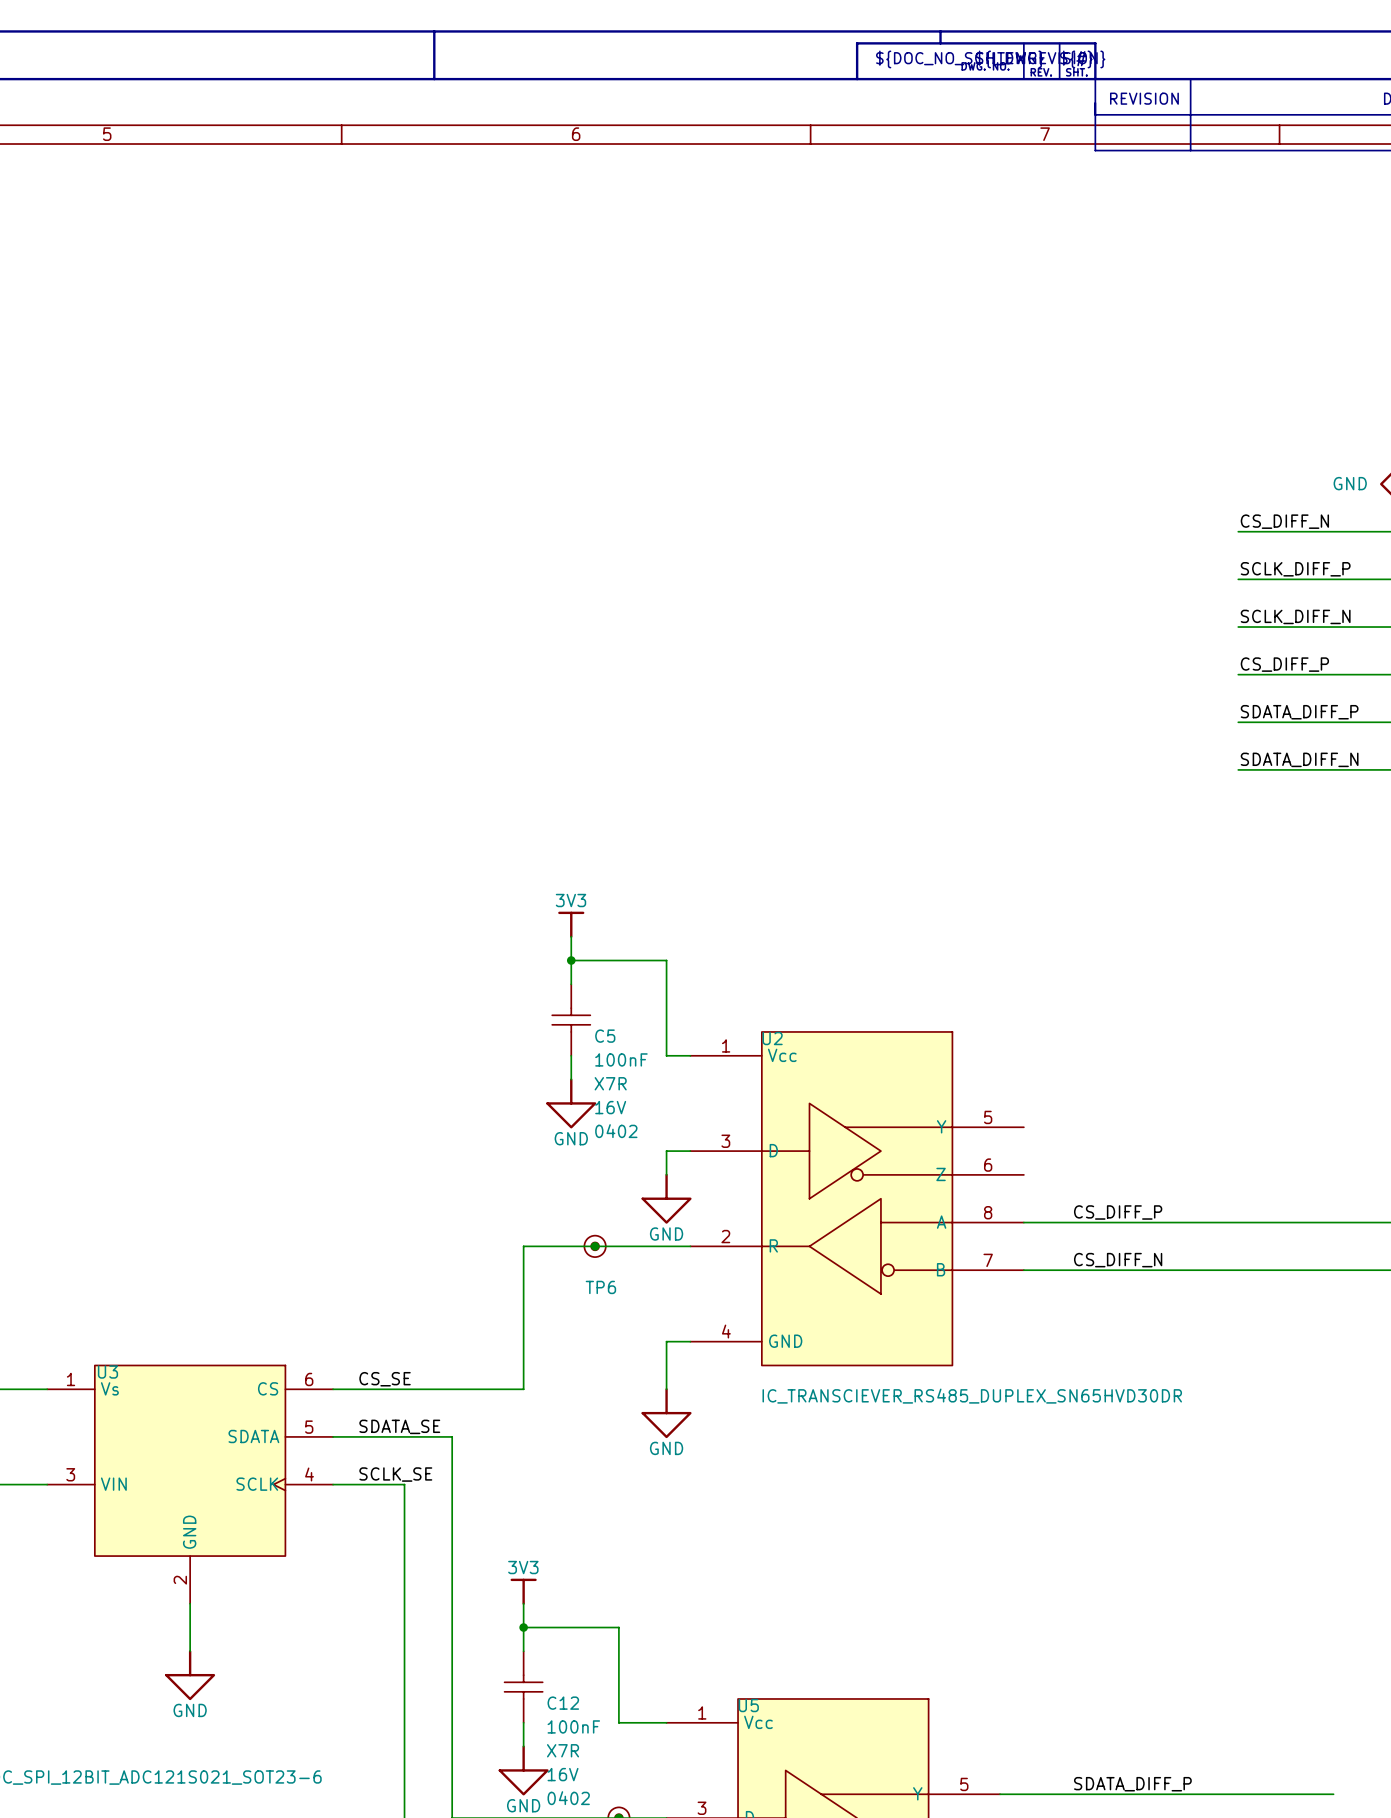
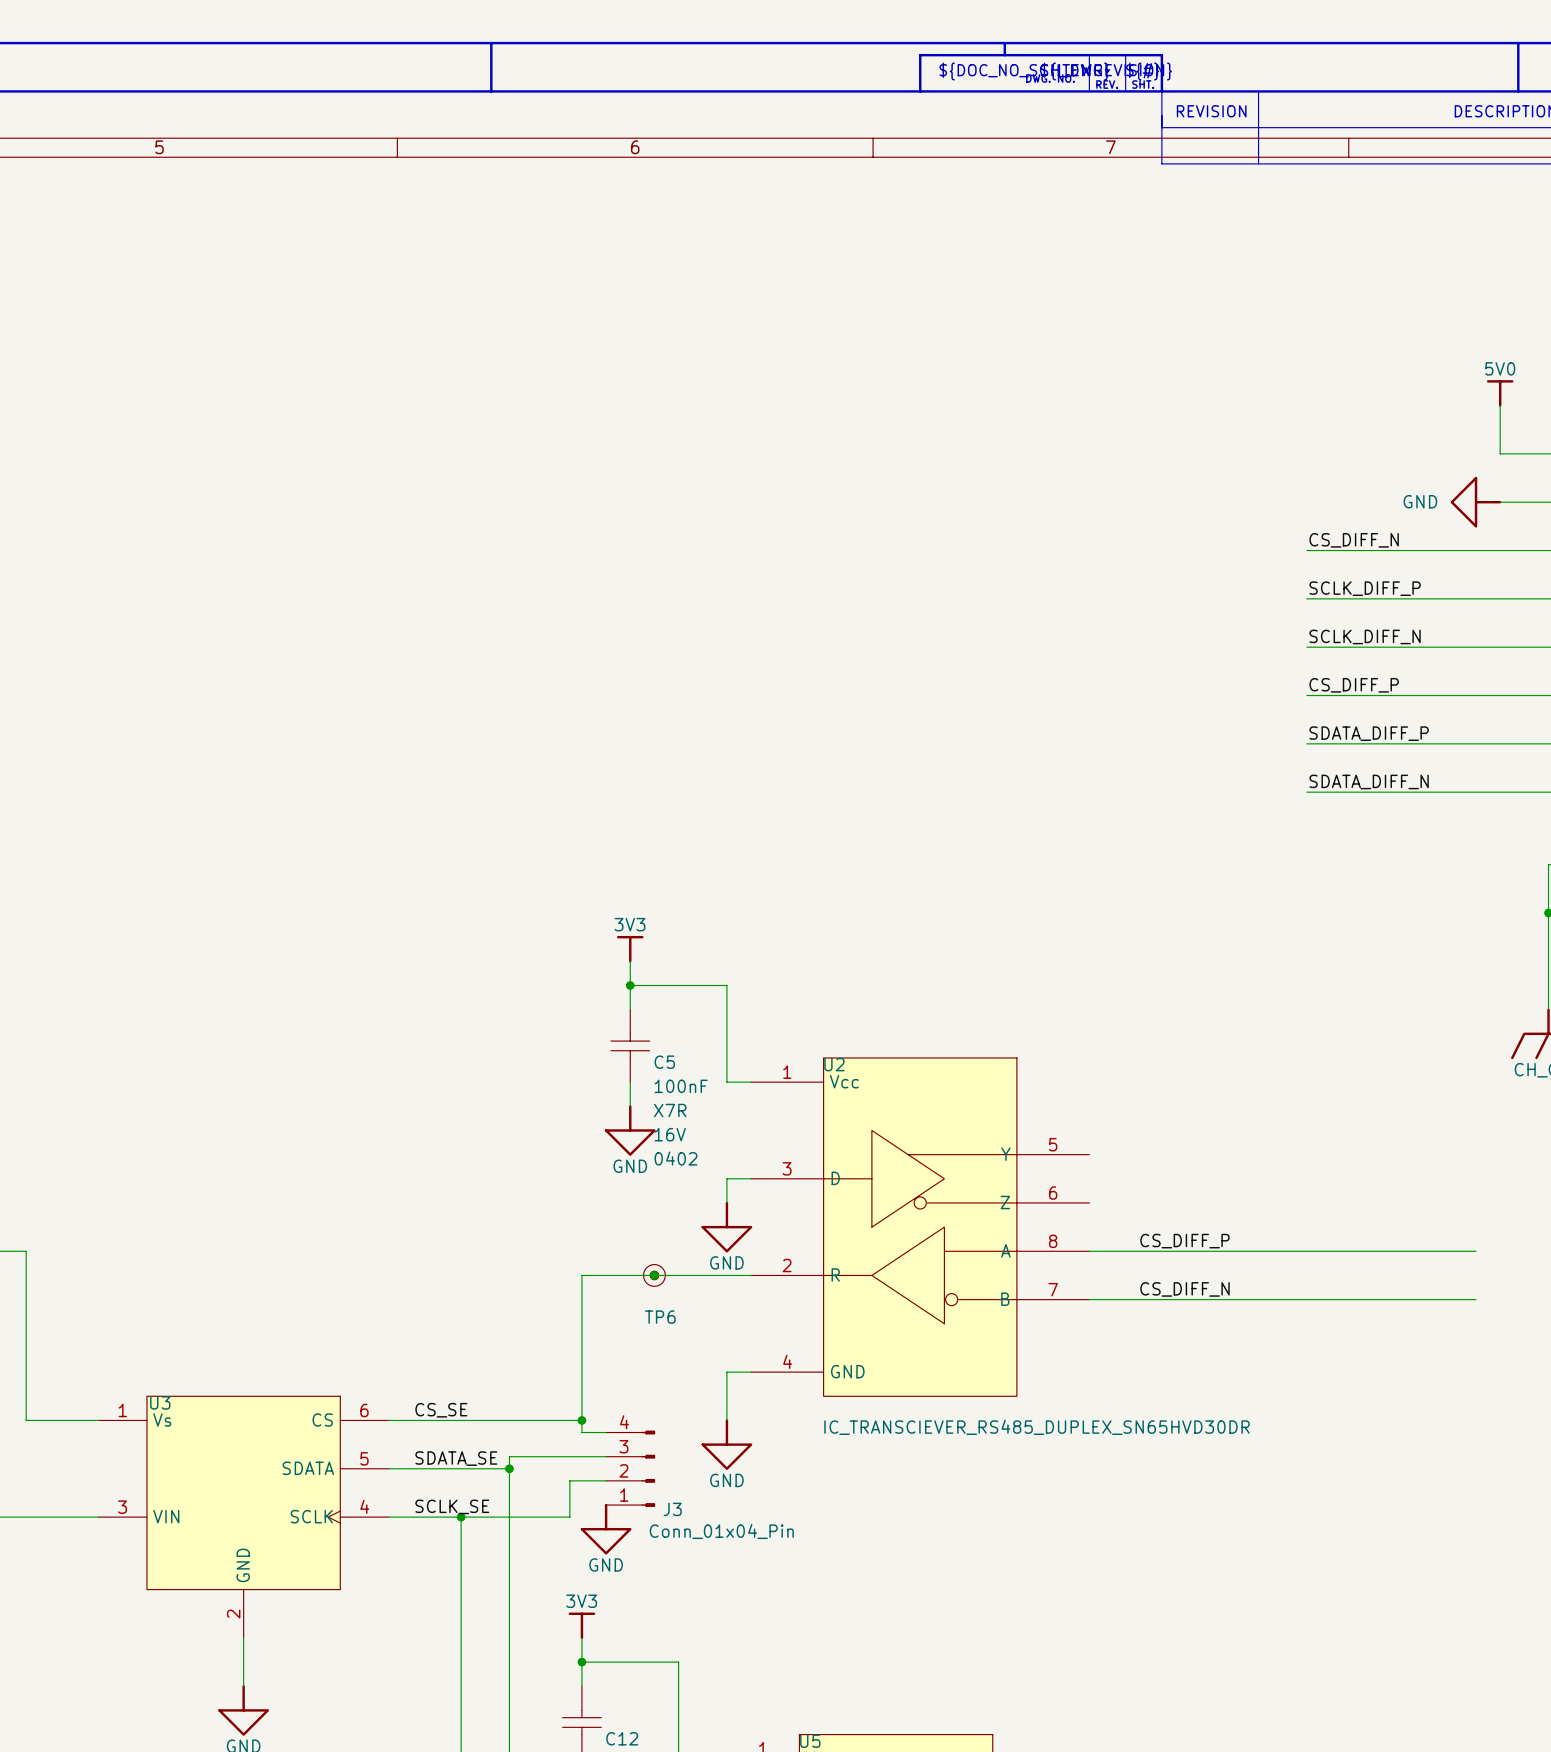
wire: none -> (581, 1420) (581, 1432) (606, 1432)
junction: none -> (581, 1420)
wire: none -> (606, 1456) (509, 1456) (509, 1468)
junction: none -> (509, 1468)
J3: none -> Conn_01x04_Pin (630, 1468)
wire: none -> (606, 1480) (569, 1480) (569, 1517) (461, 1517)
junction: none -> (461, 1517)
power symbol: none -> GND (606, 1529)

